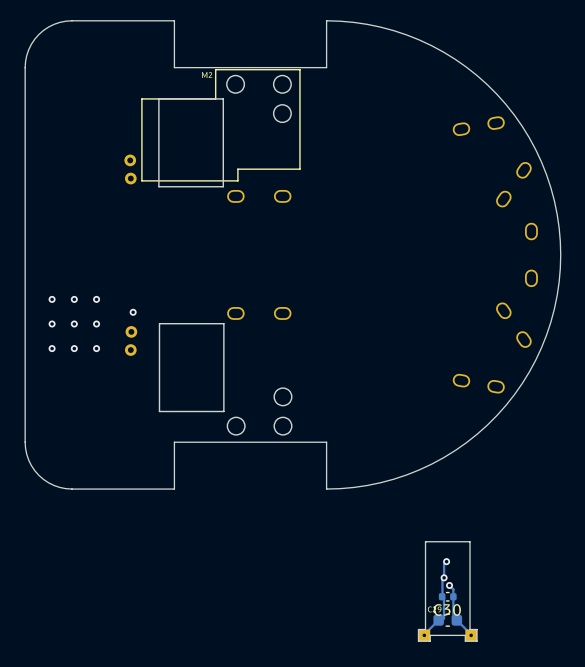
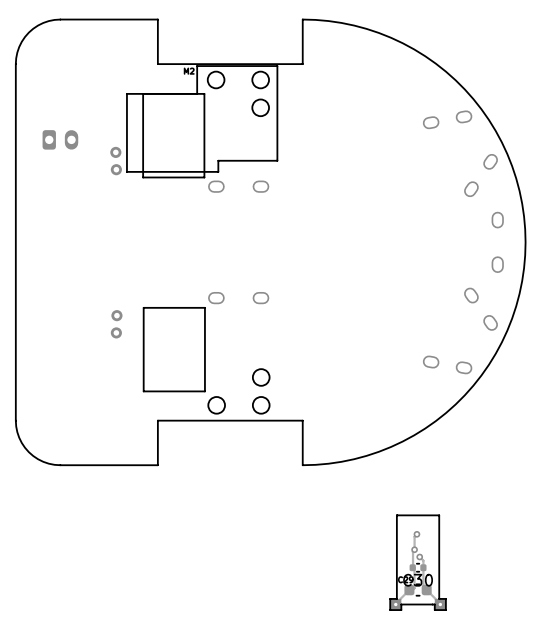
part: none -> (60, 139)
via: (52, 299) -> none
via: (74, 299) -> none
via: (96, 299) -> none
via: (133, 312) -> none
via: (52, 324) -> none
via: (74, 324) -> none
via: (96, 324) -> none
via: (52, 348) -> none
via: (74, 348) -> none
via: (96, 348) -> none

